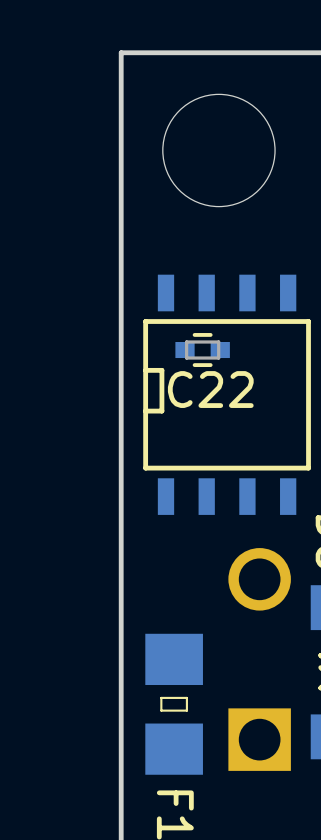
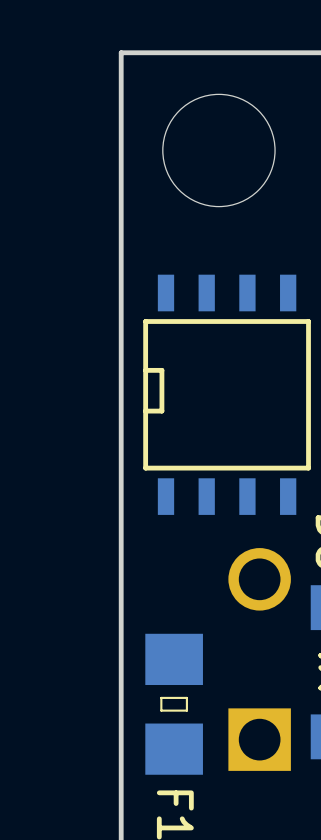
C22: (202, 350) -> none

